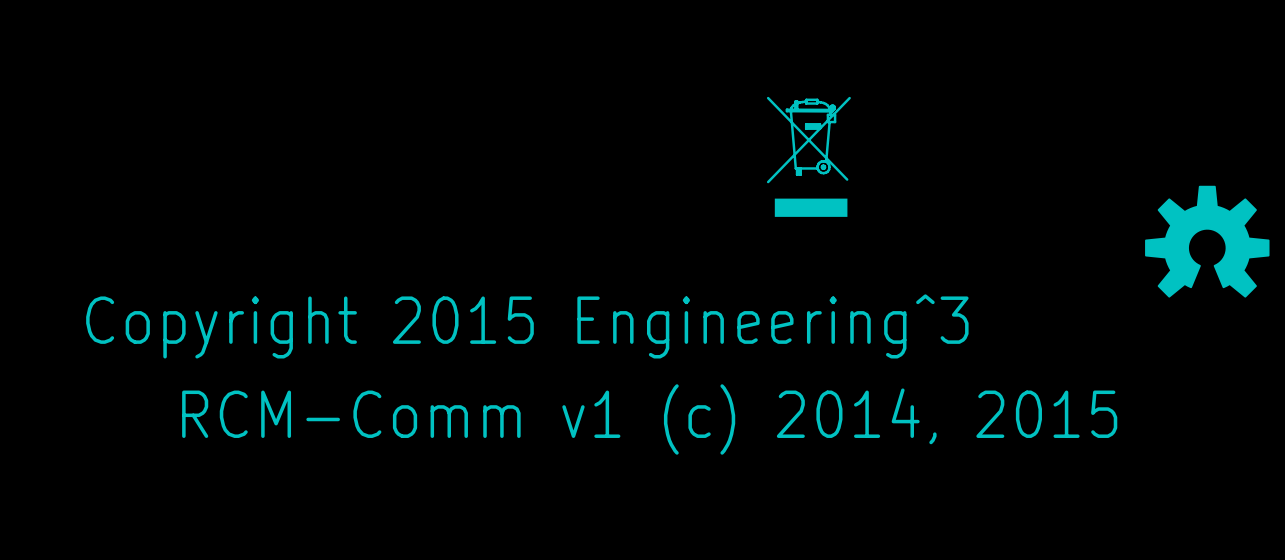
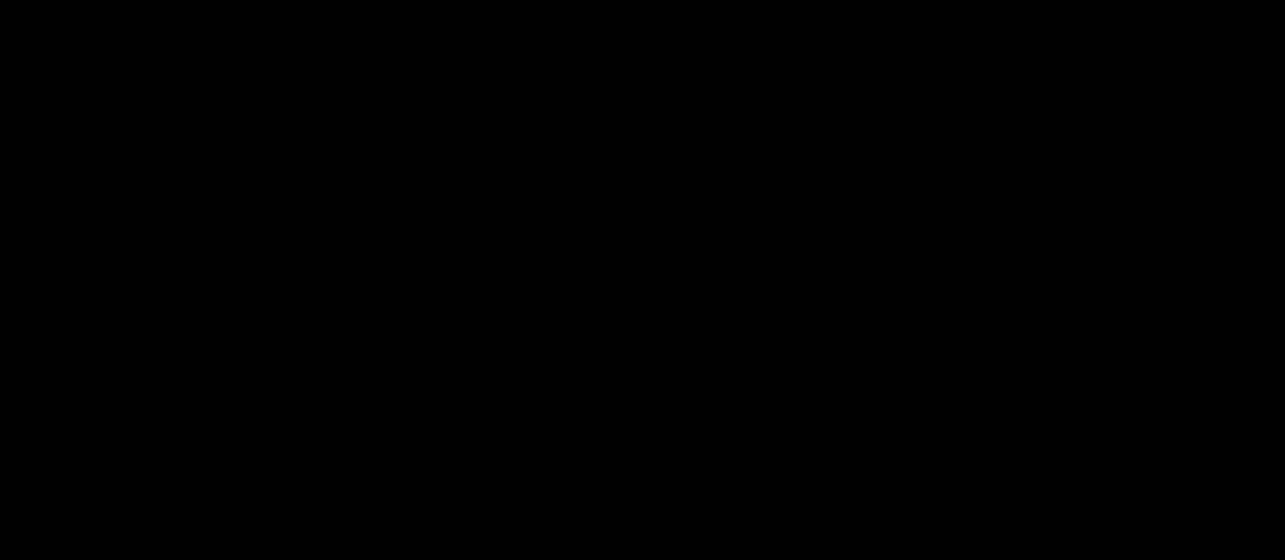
drawing: [766, 96, 851, 217] -> none
drawing: [1145, 185, 1270, 298] -> none
text: Copyright 2015 Engineering^3 (527, 326) -> none
text: RCM-Comm v1 (c) 2014, 2015 (649, 419) -> none

